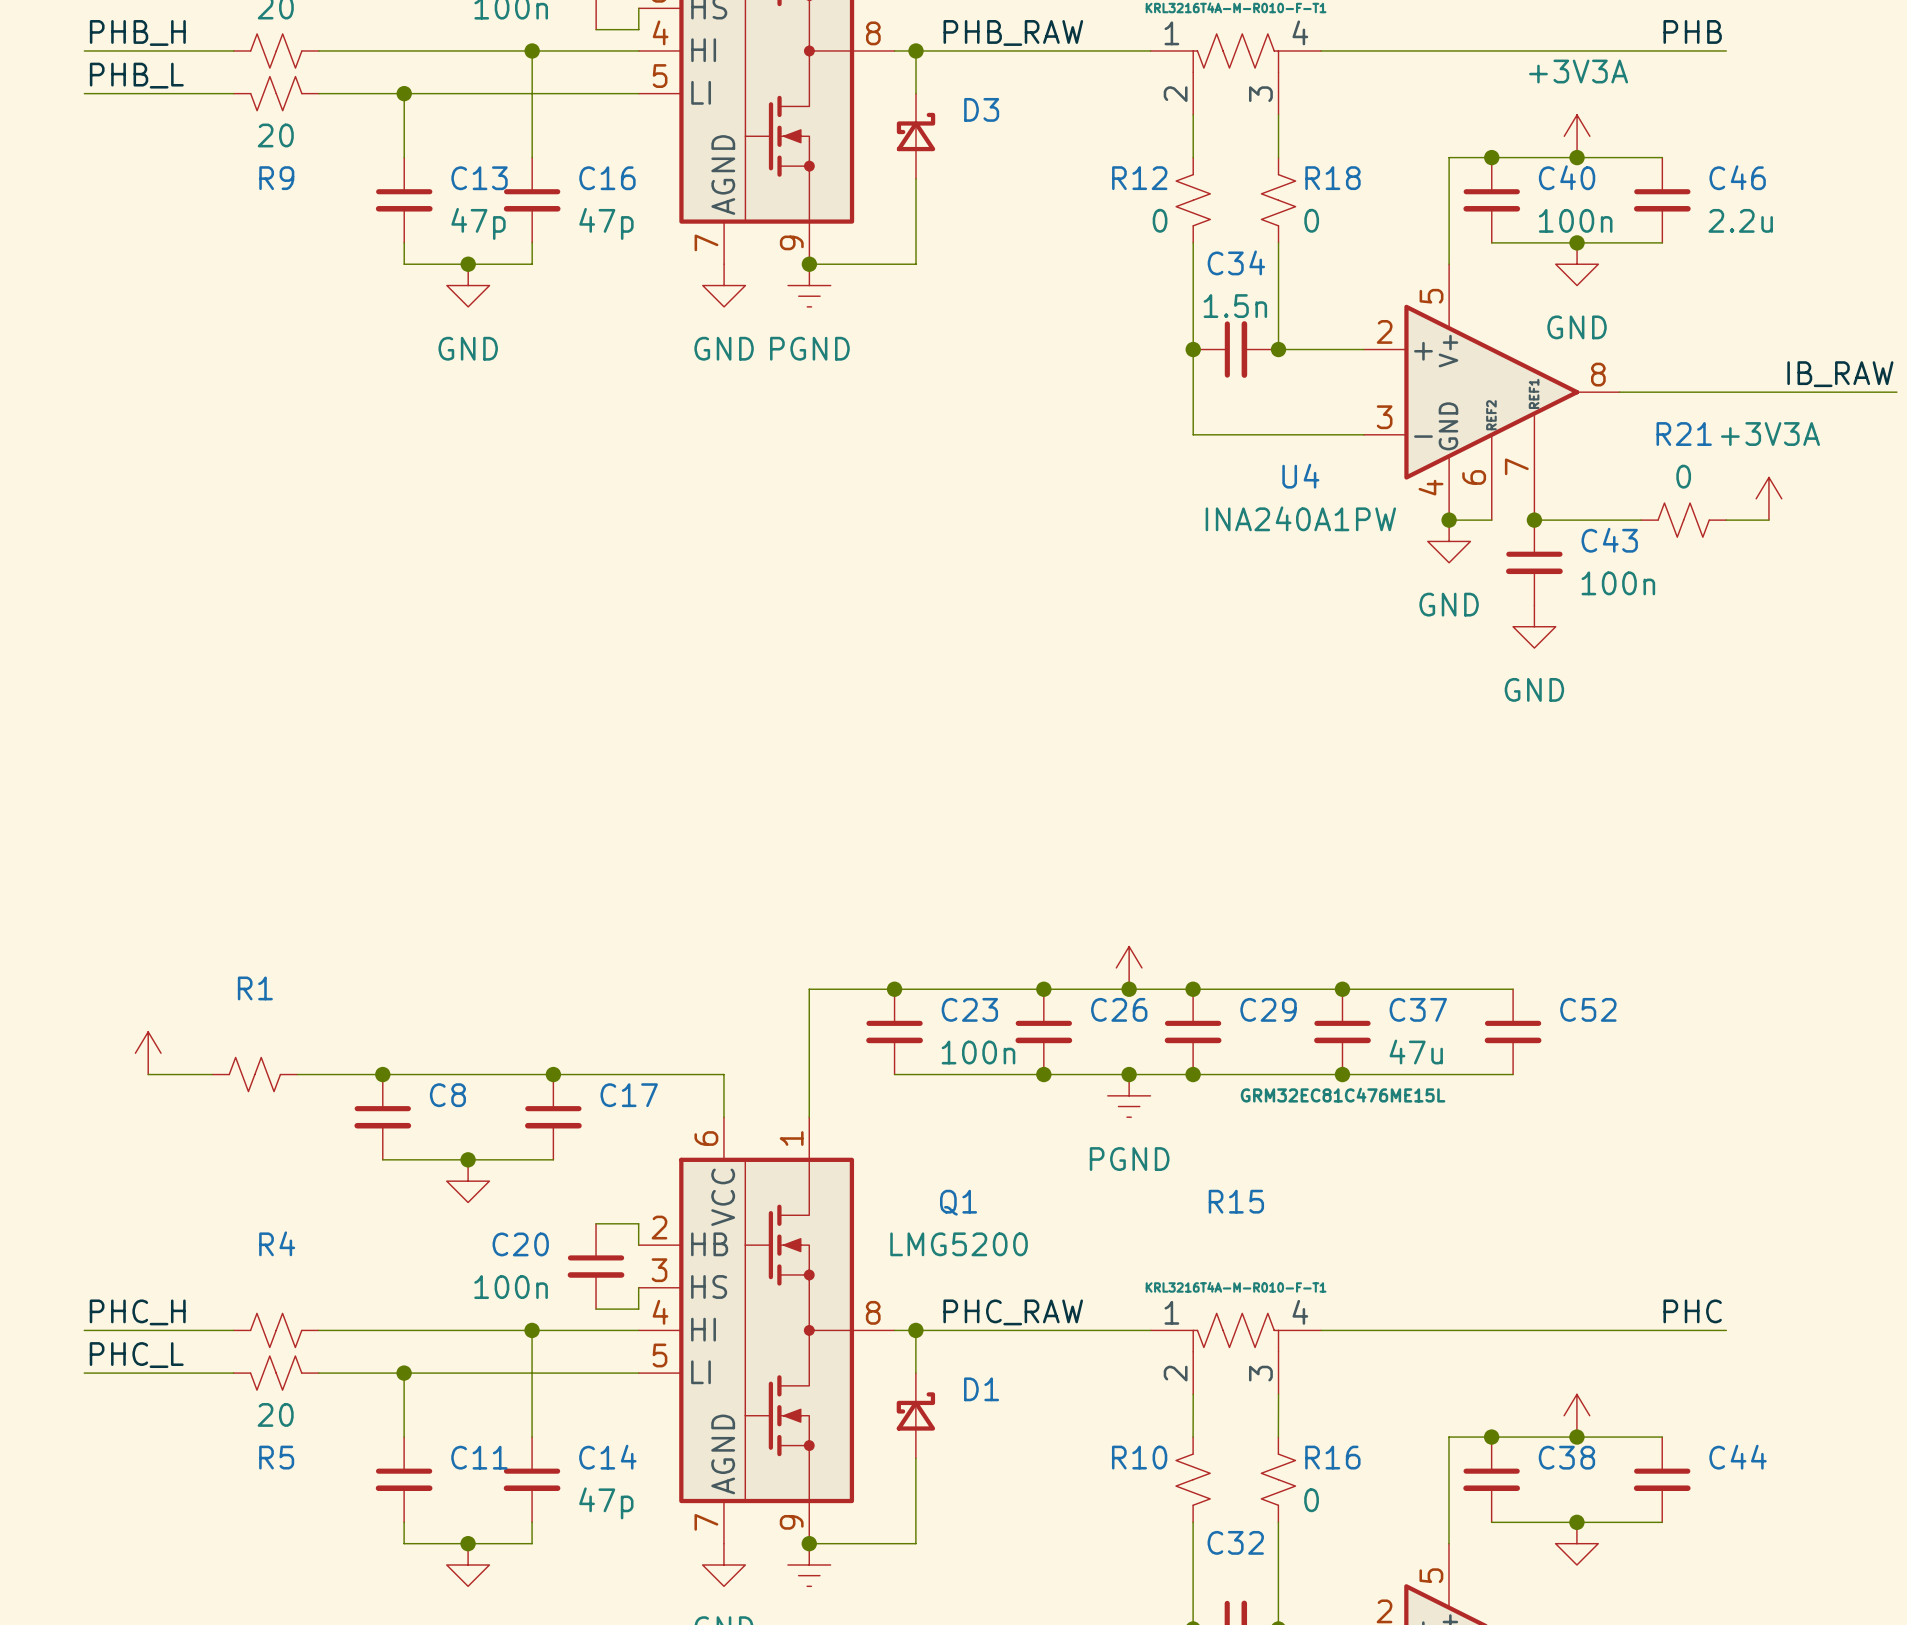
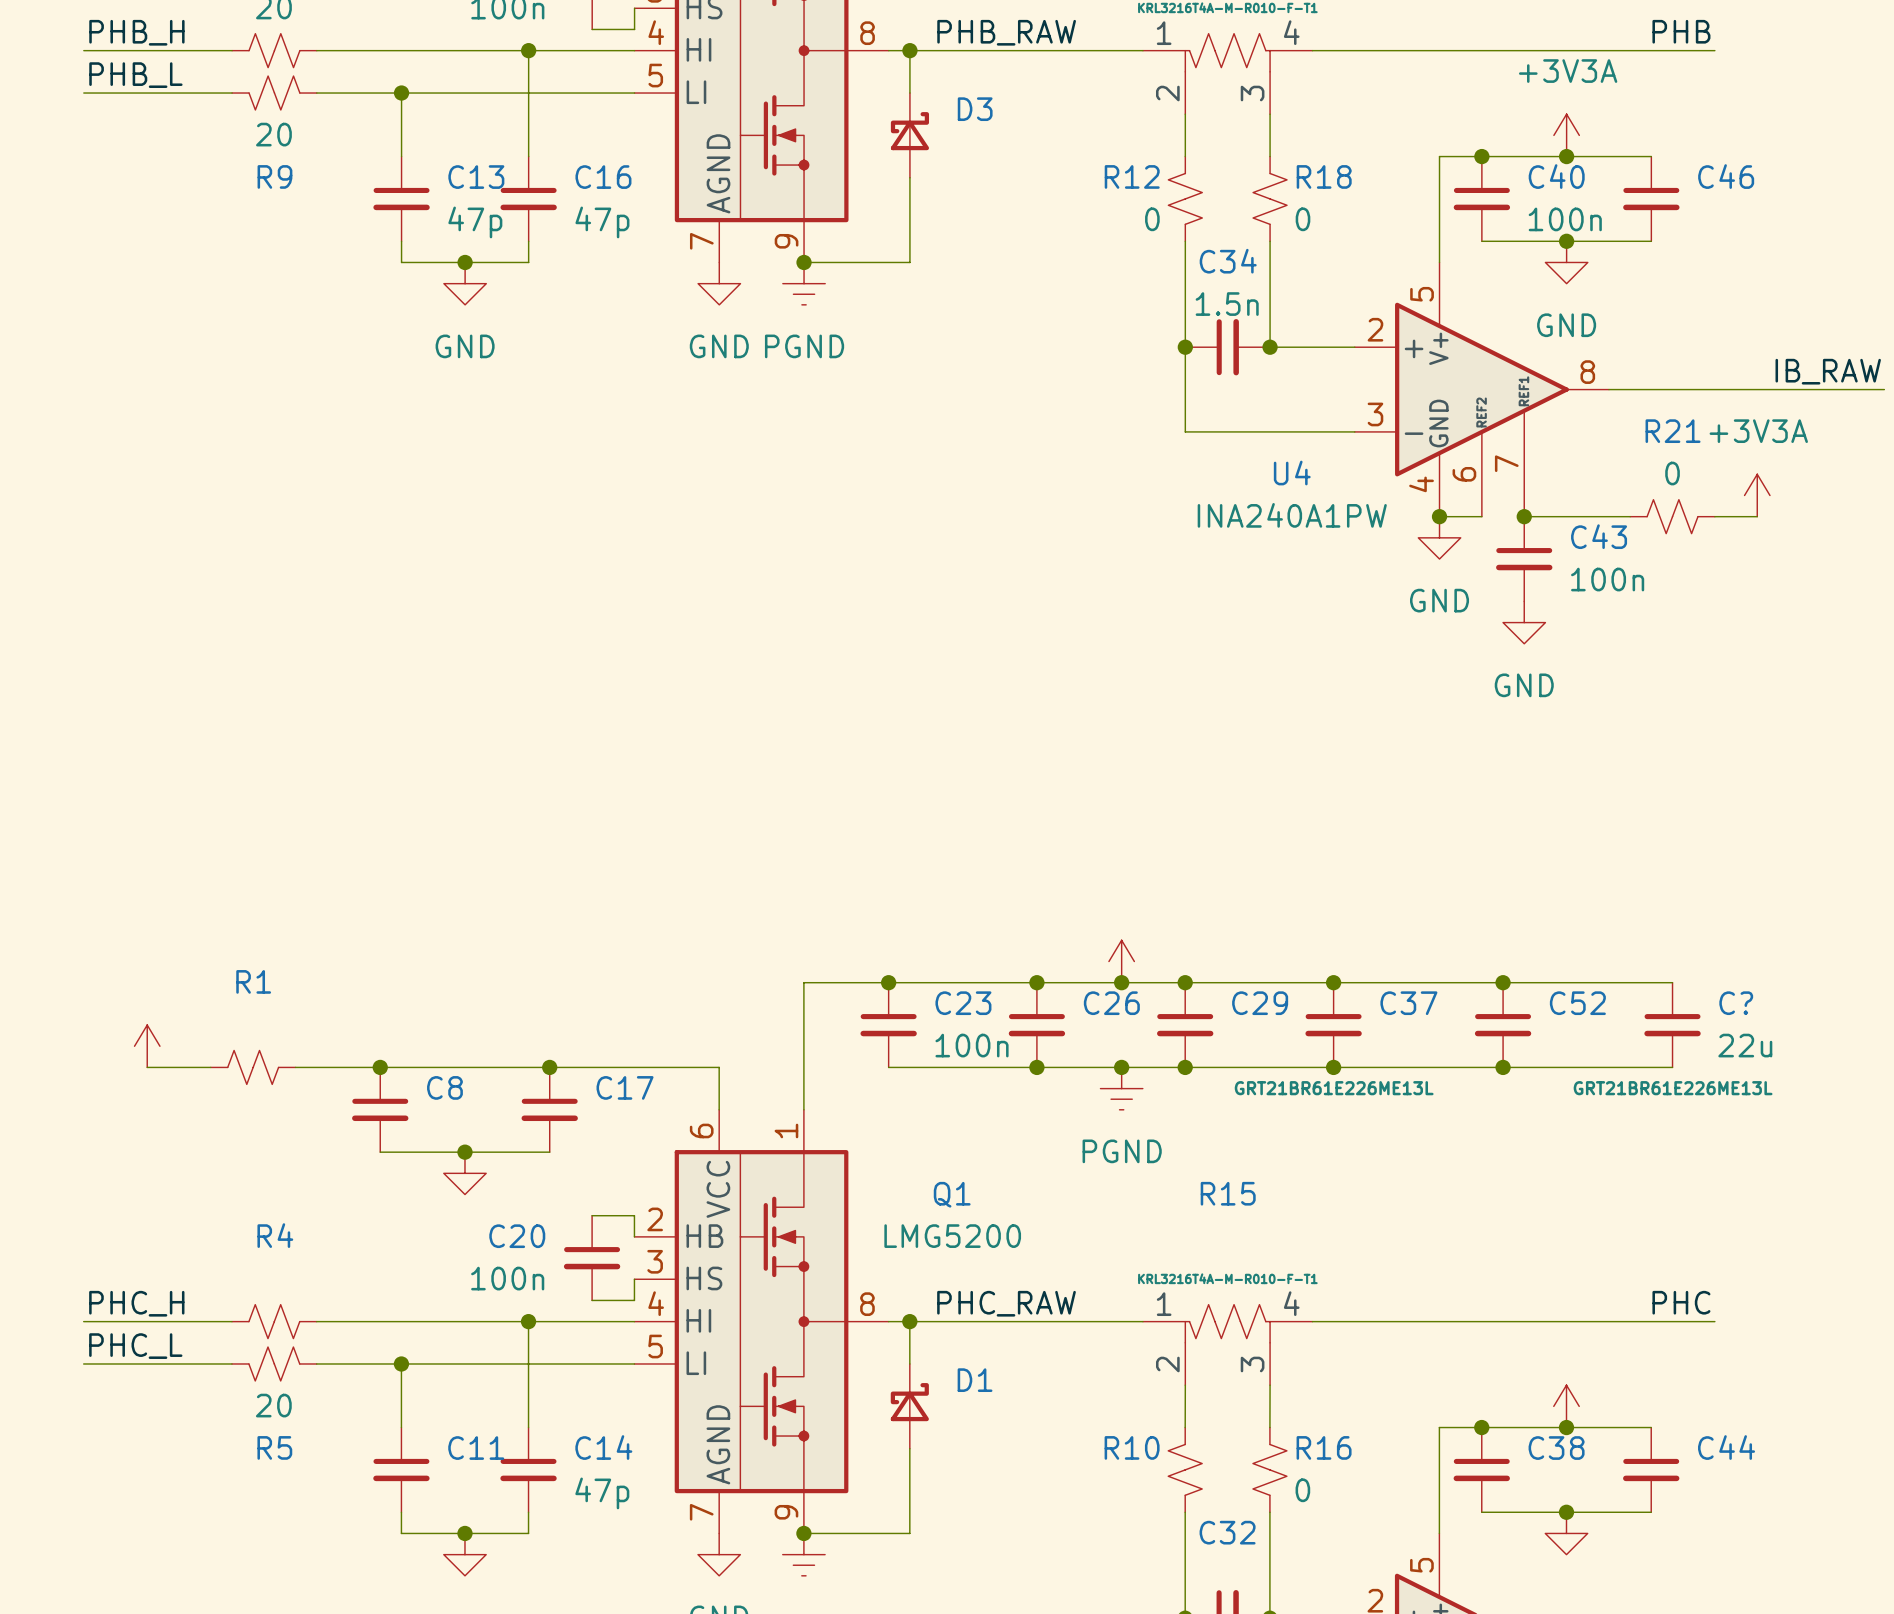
C46 value: 2.2u (1740, 220) -> none
wire: none -> (1503, 982) (1672, 982)
junction: none -> (1503, 982)
C?: none -> 22u (1672, 1025)
C37 value: 47u (1416, 1052) -> none
wire: none -> (1503, 1067) (1672, 1067)
junction: none -> (1503, 1067)
C37 text: GRM32EC81C476ME15L (1343, 1095) -> GRT21BR61E226ME13L (1334, 1088)

